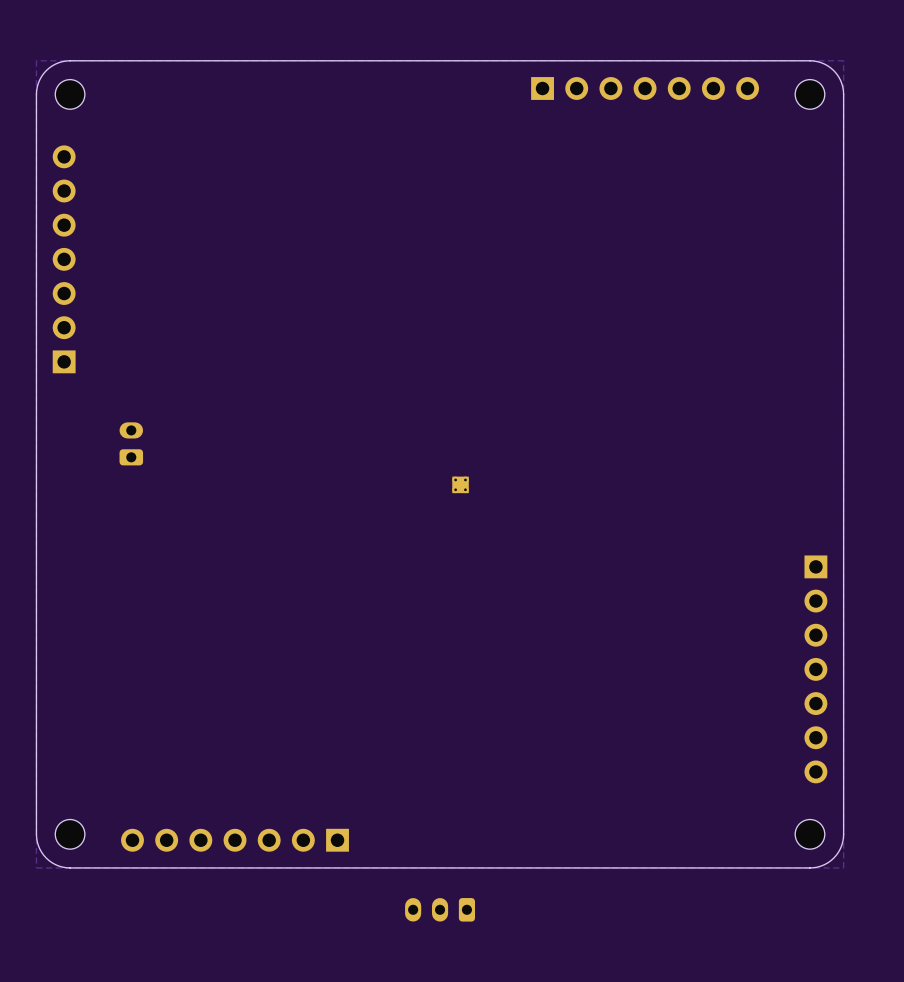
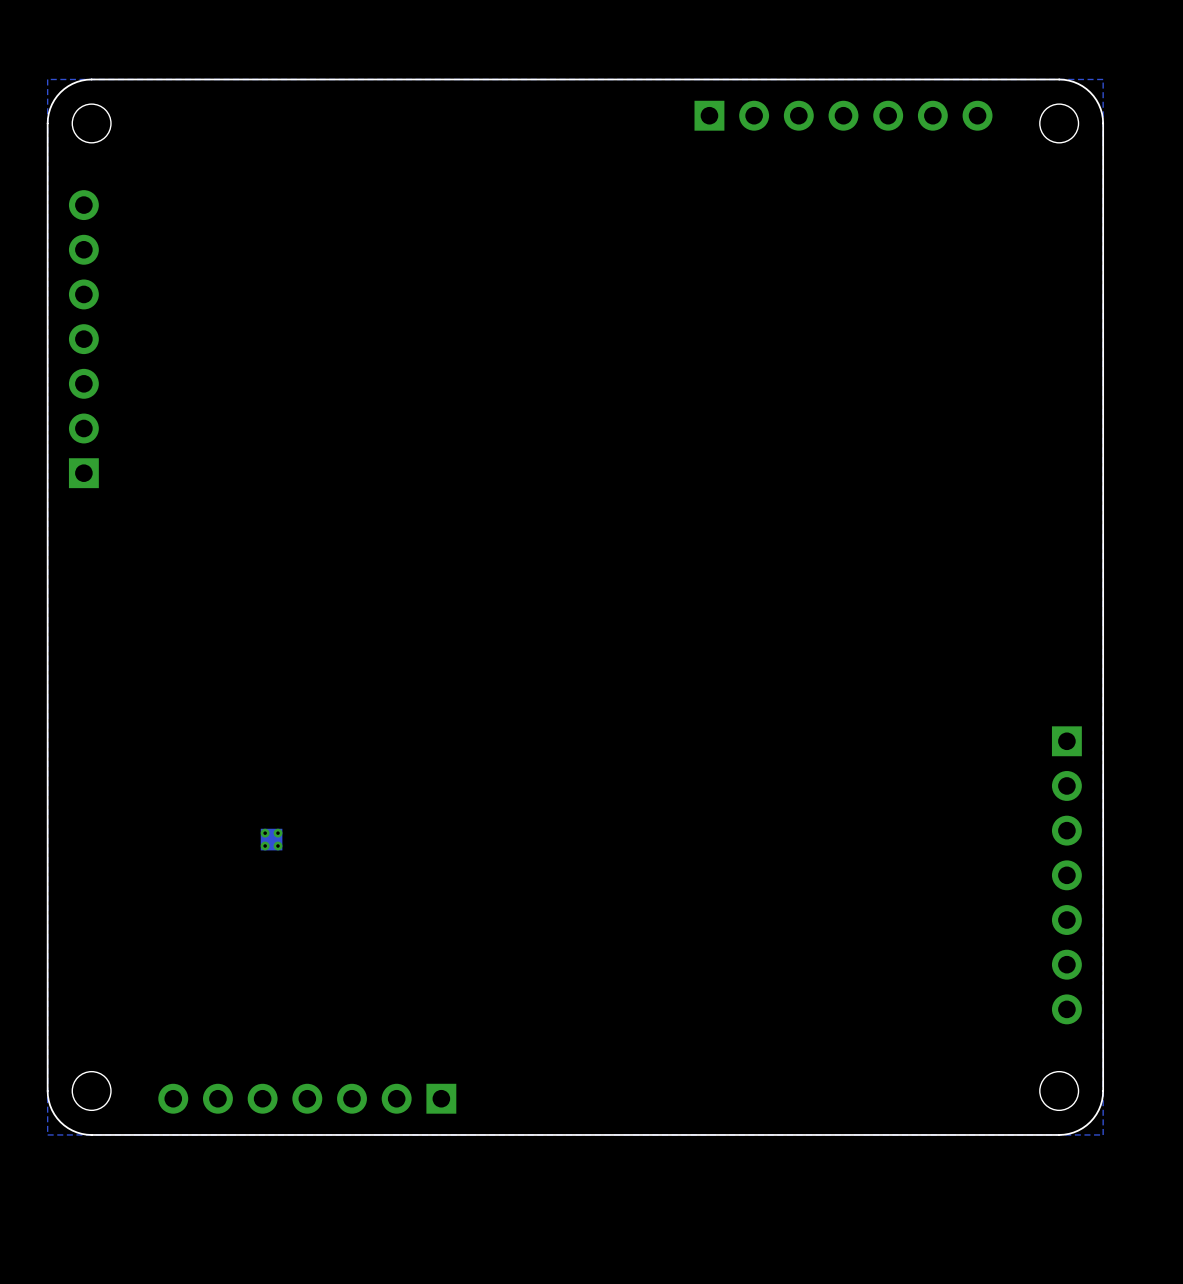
part: (131, 443) -> none
part position: (460, 484) -> (271, 839)
part: (440, 909) -> none

